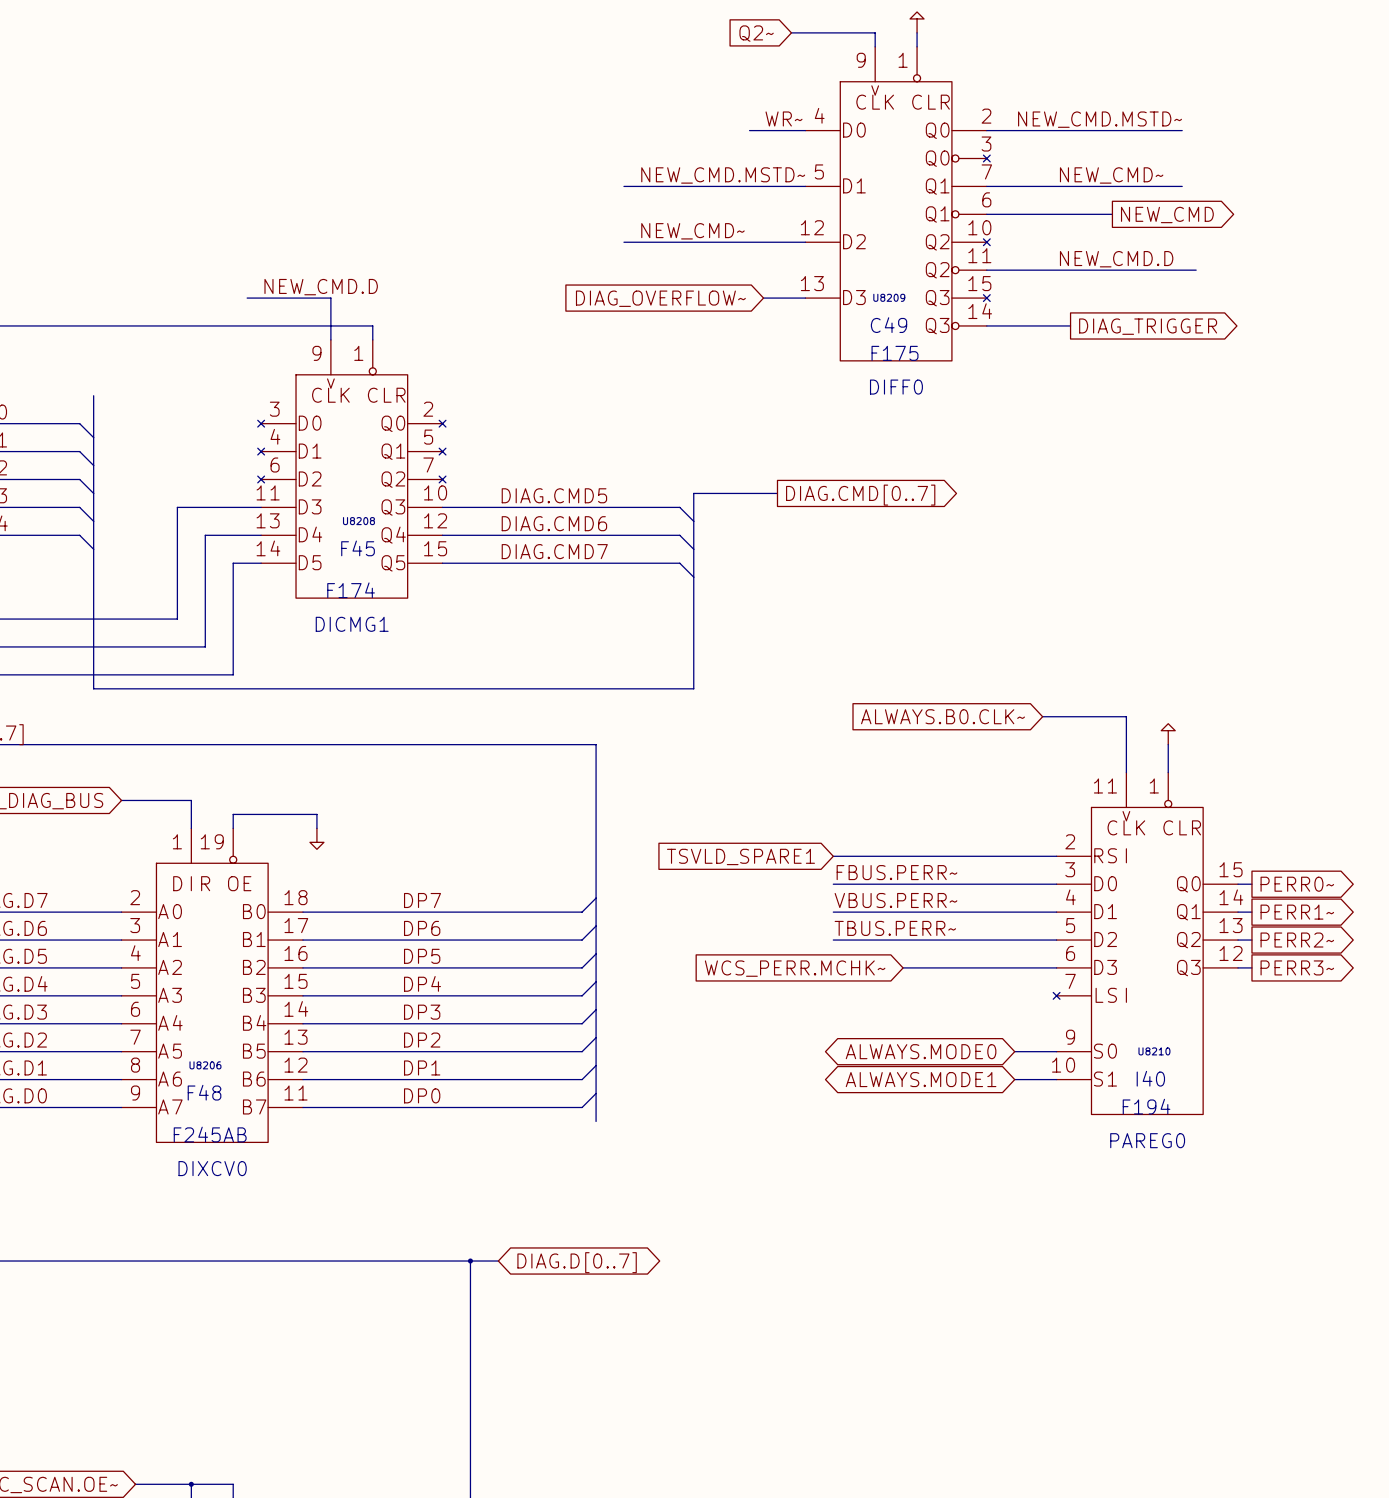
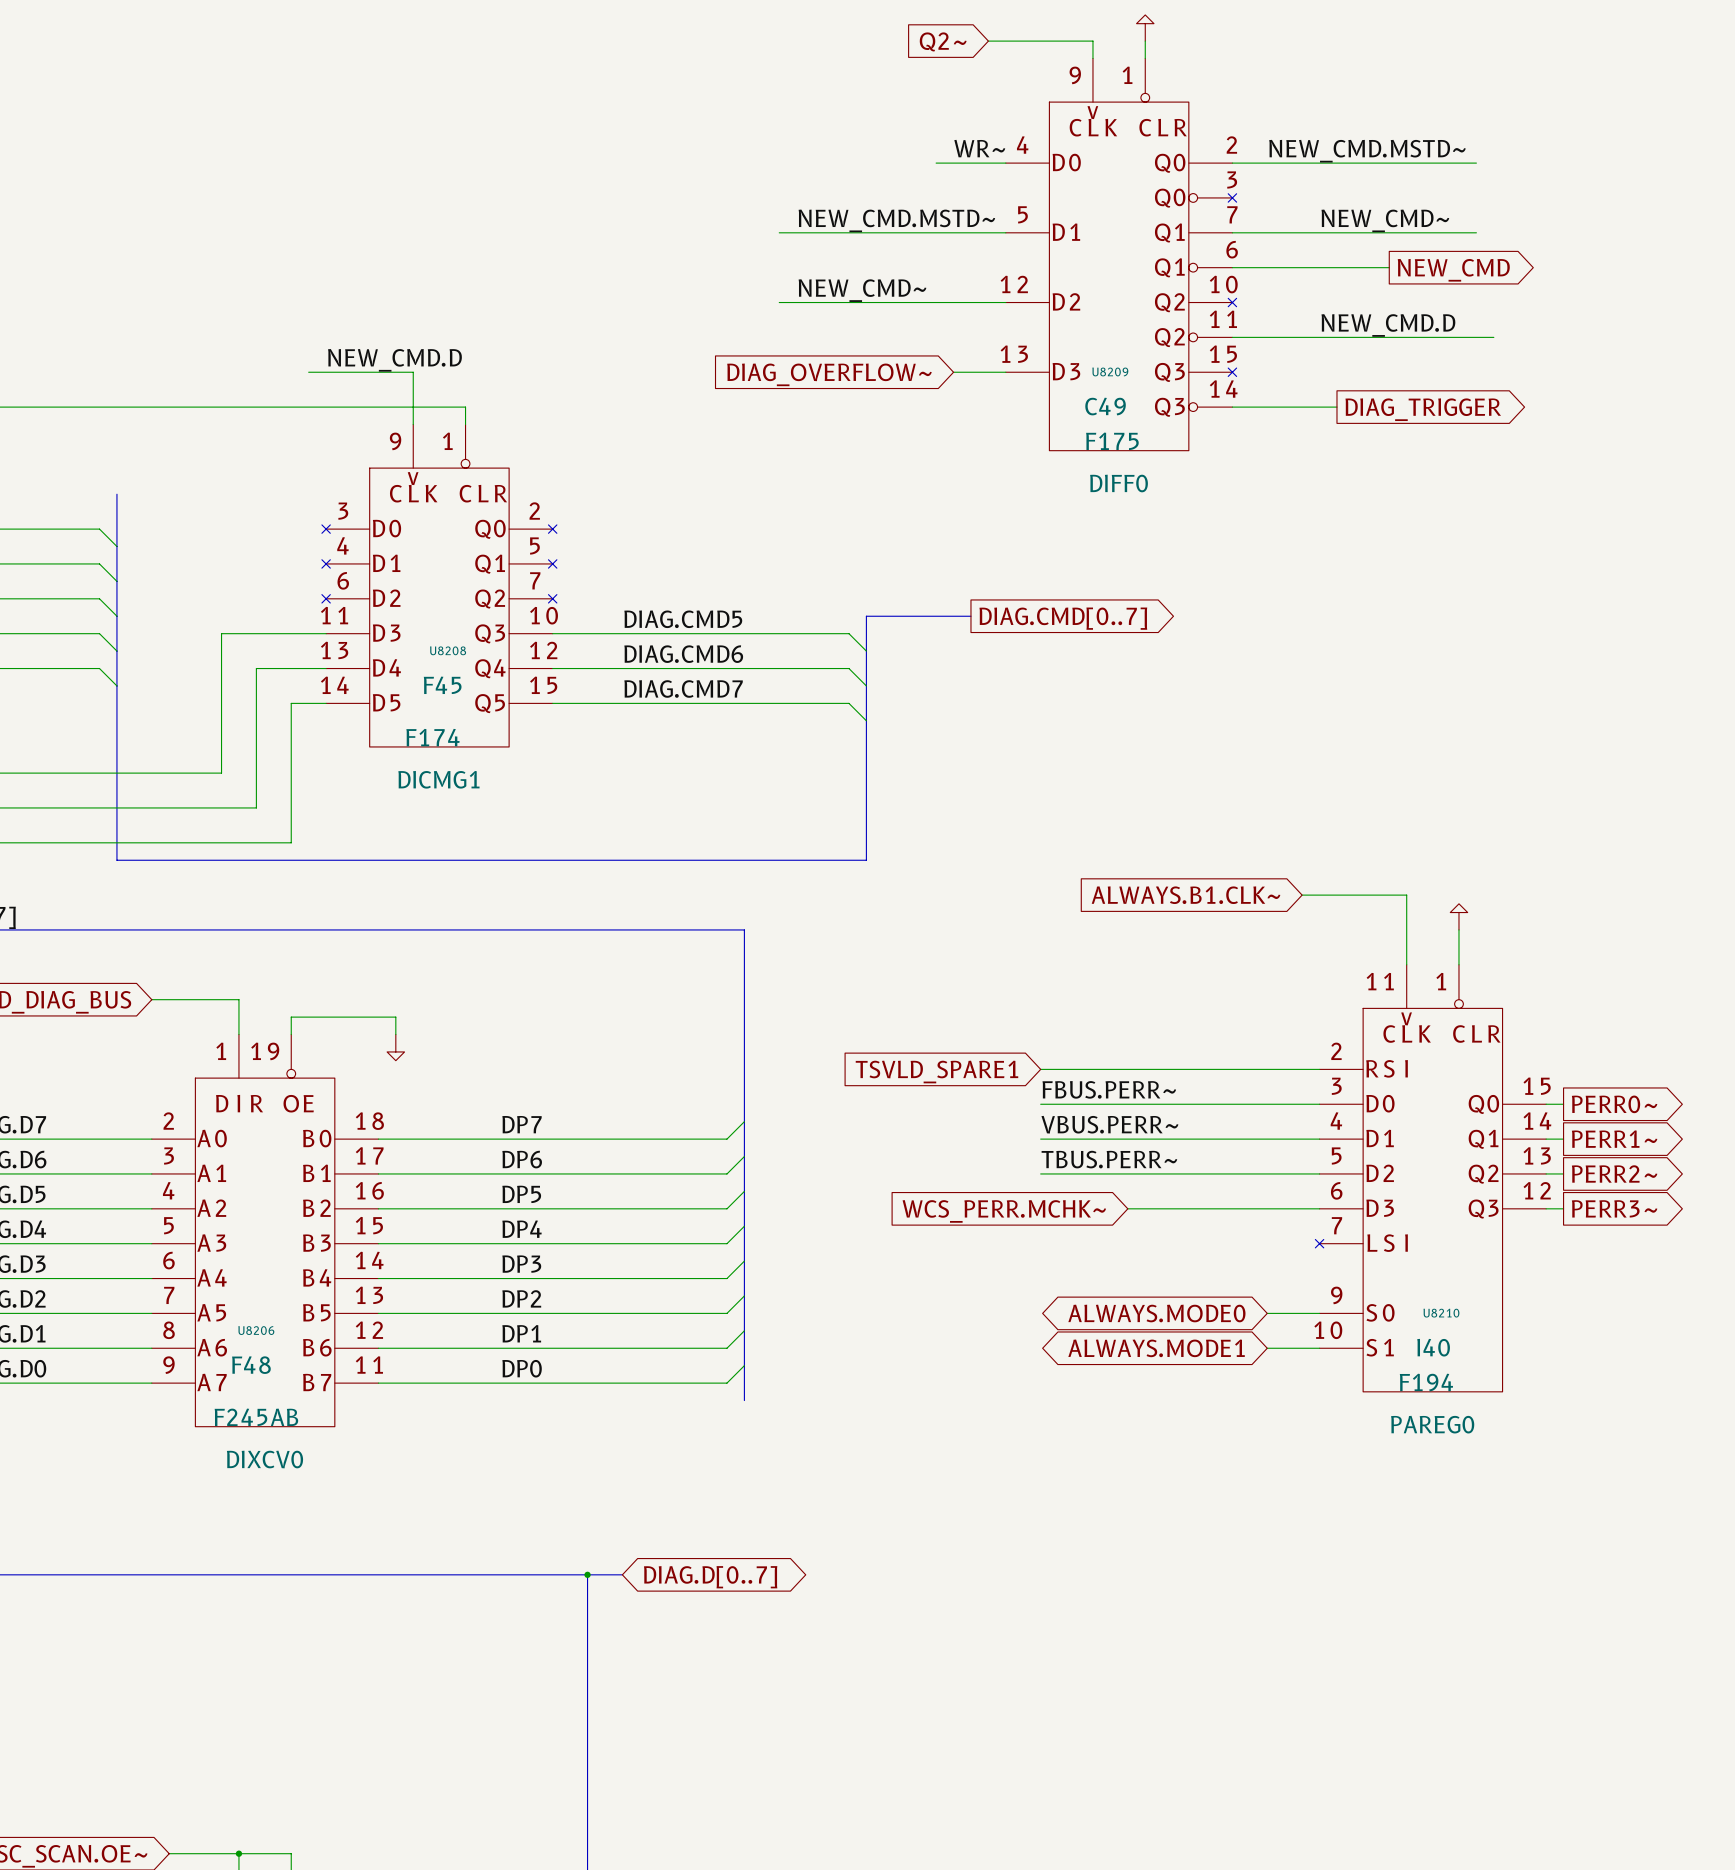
global label: ALWAYS.B0.CLK~ (942, 716) -> ALWAYS.B1.CLK~ (1186, 895)

